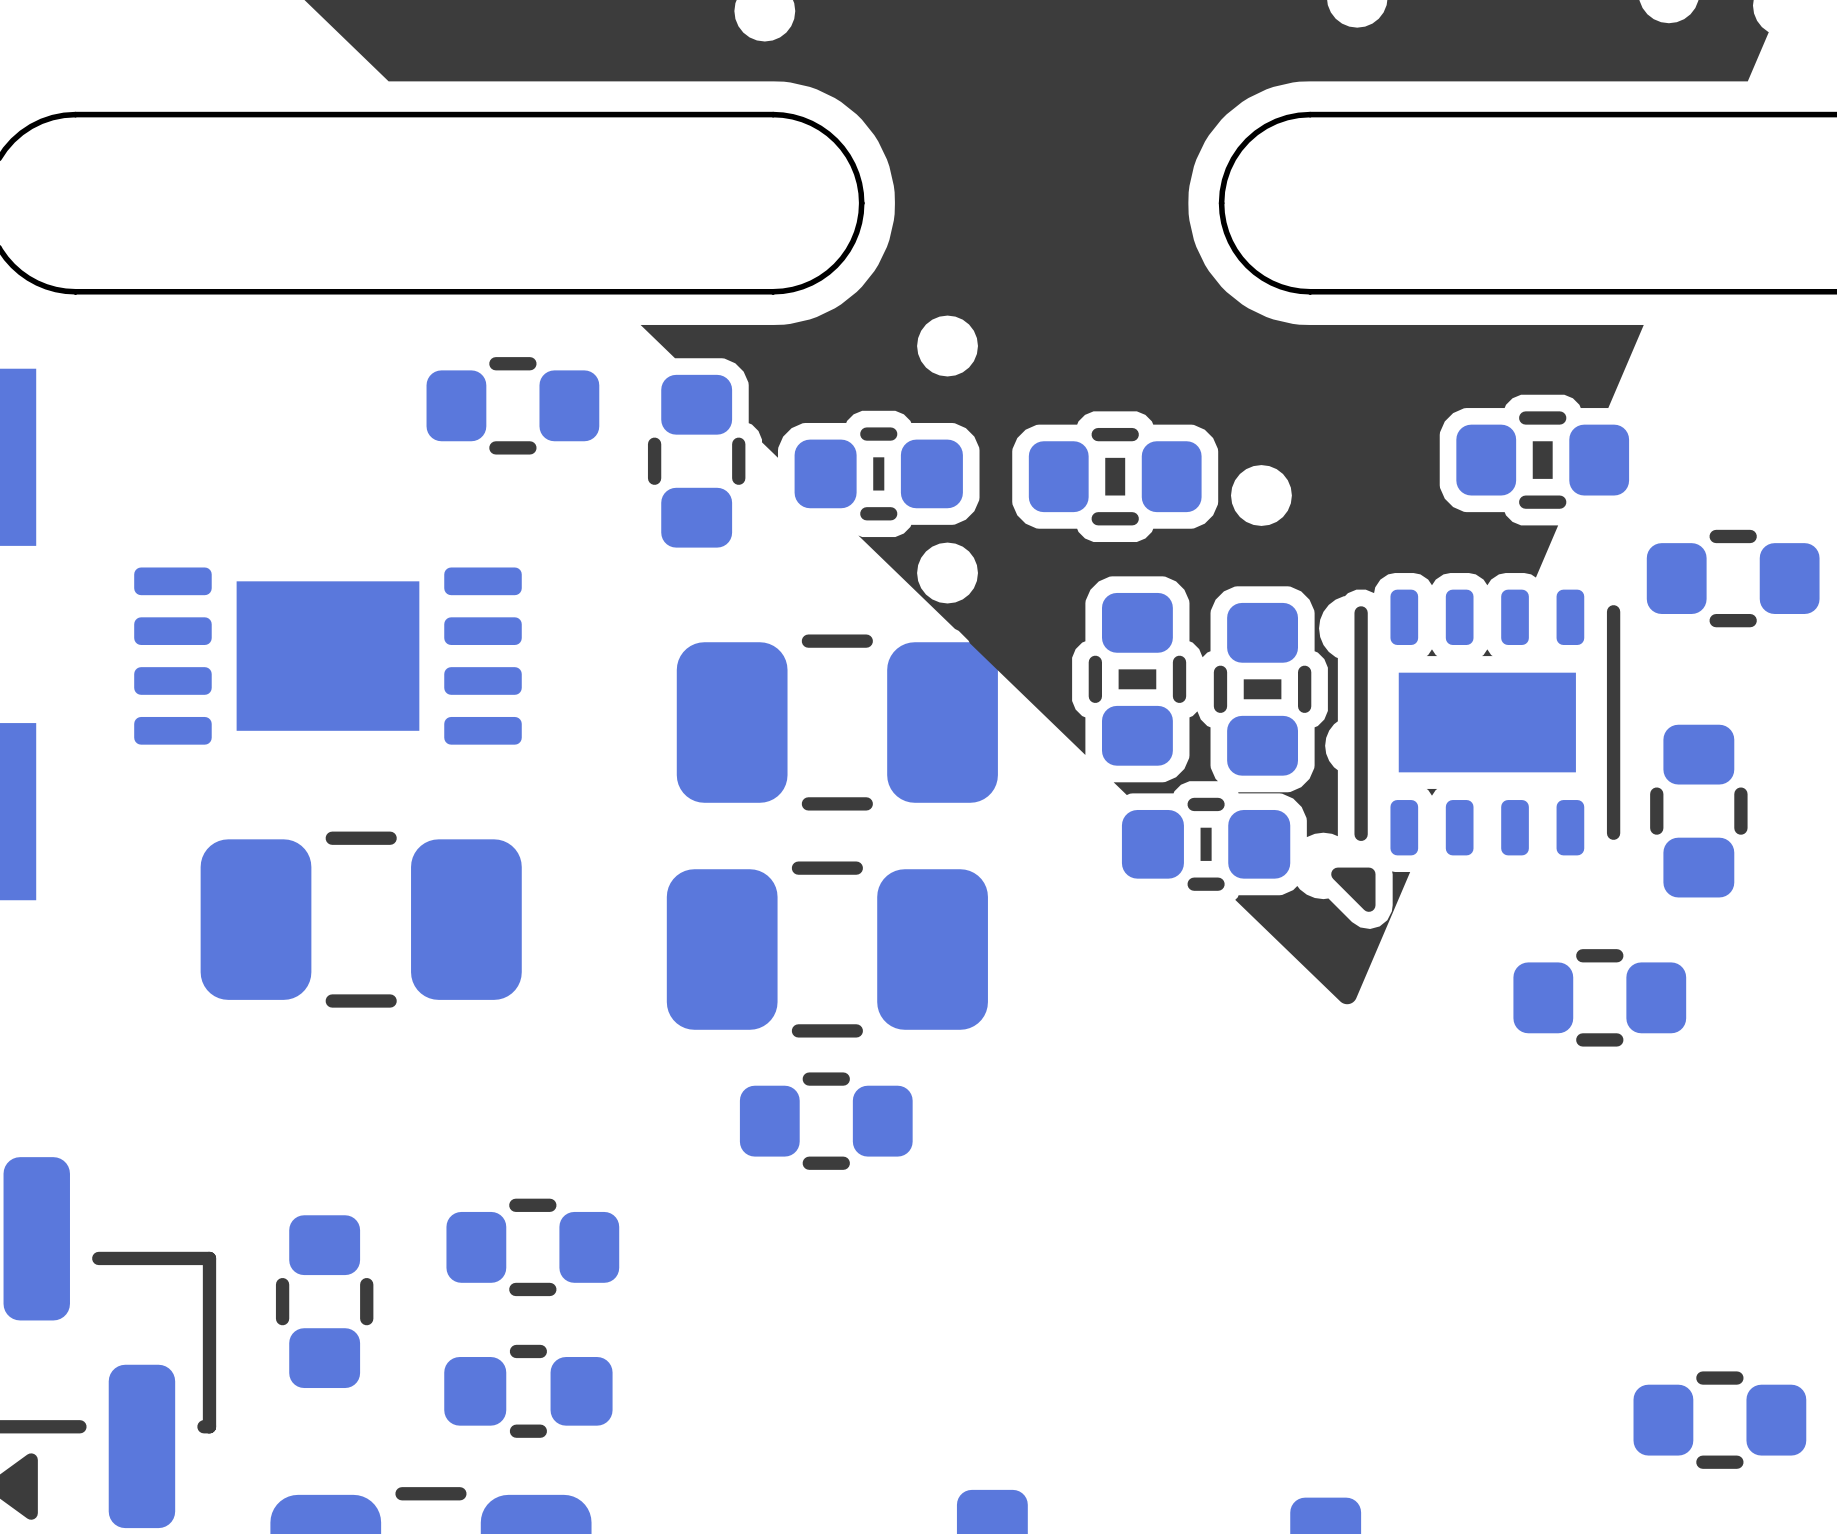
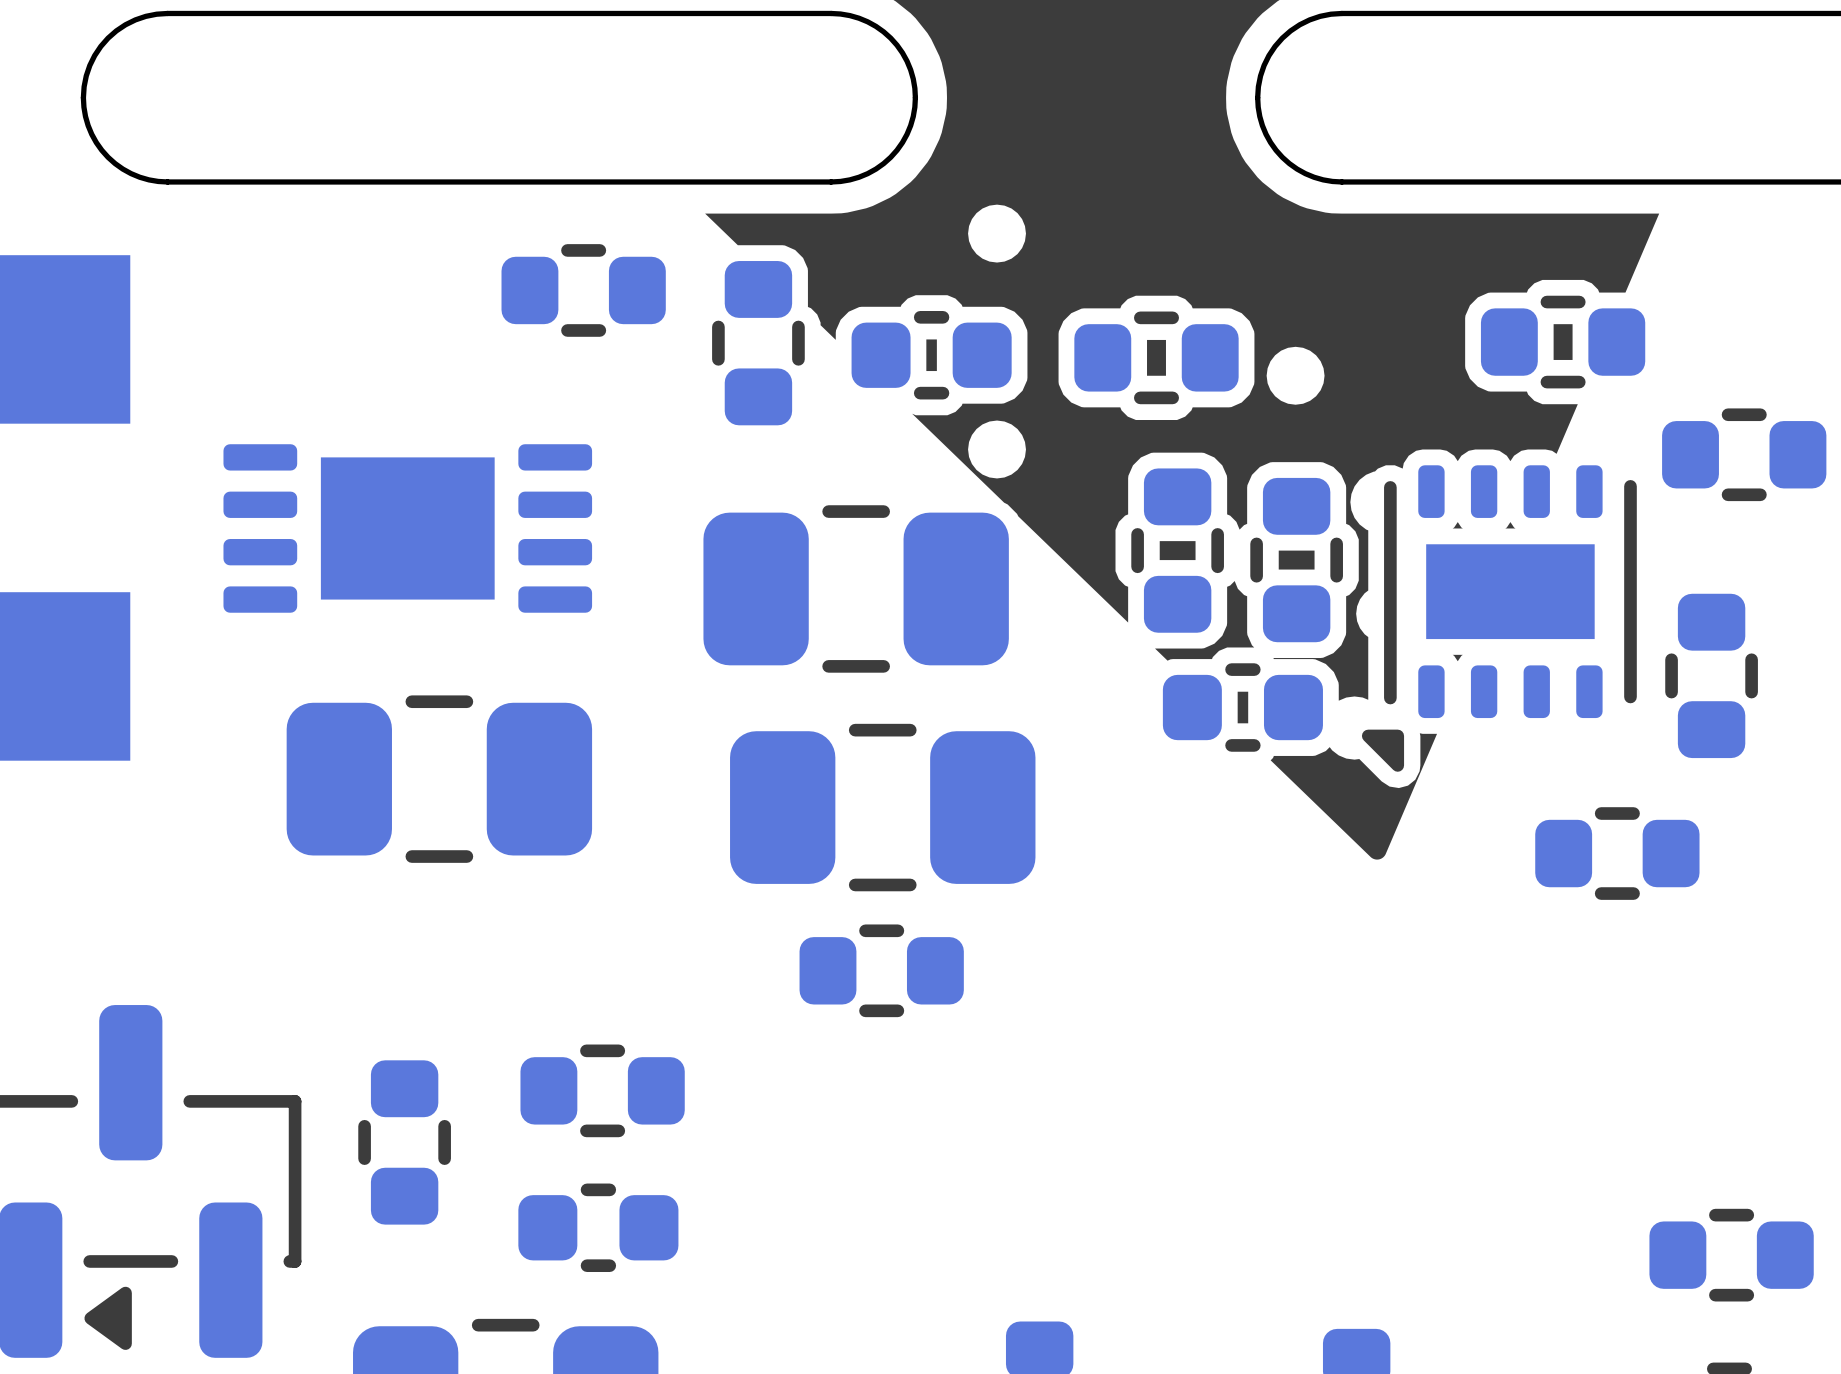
part position: (837, 722) -> (856, 588)

